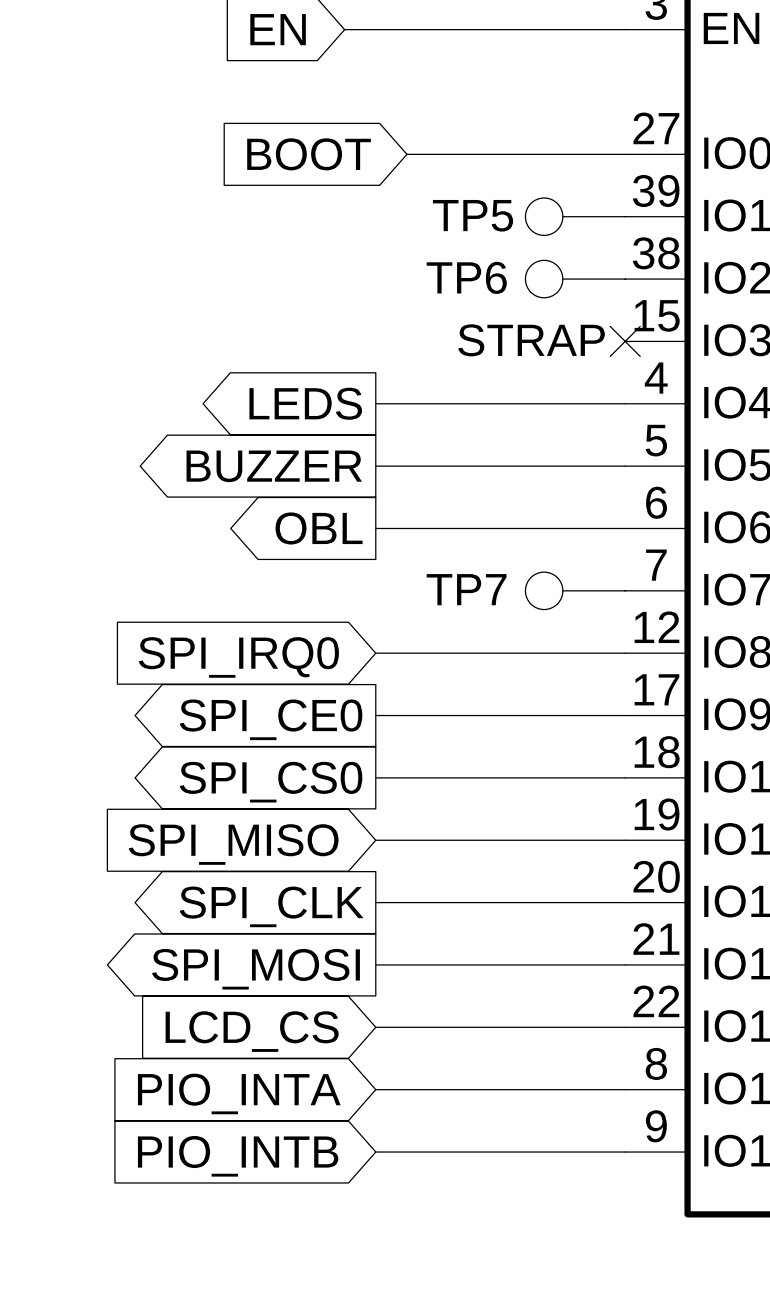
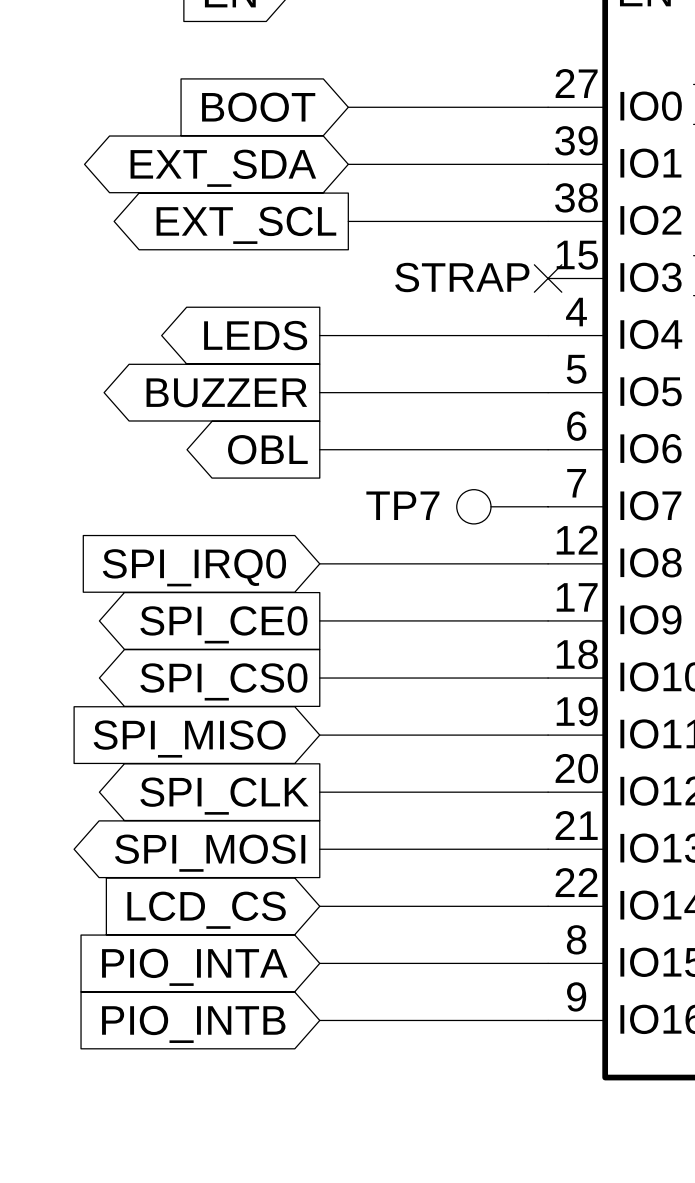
wire: none -> (348, 164) (548, 164)
TP5: (575, 216) -> none
global label: none -> EXT_SDA (223, 168)
wire: none -> (348, 221) (548, 221)
TP6: (575, 279) -> none
global label: none -> EXT_SCL (246, 225)

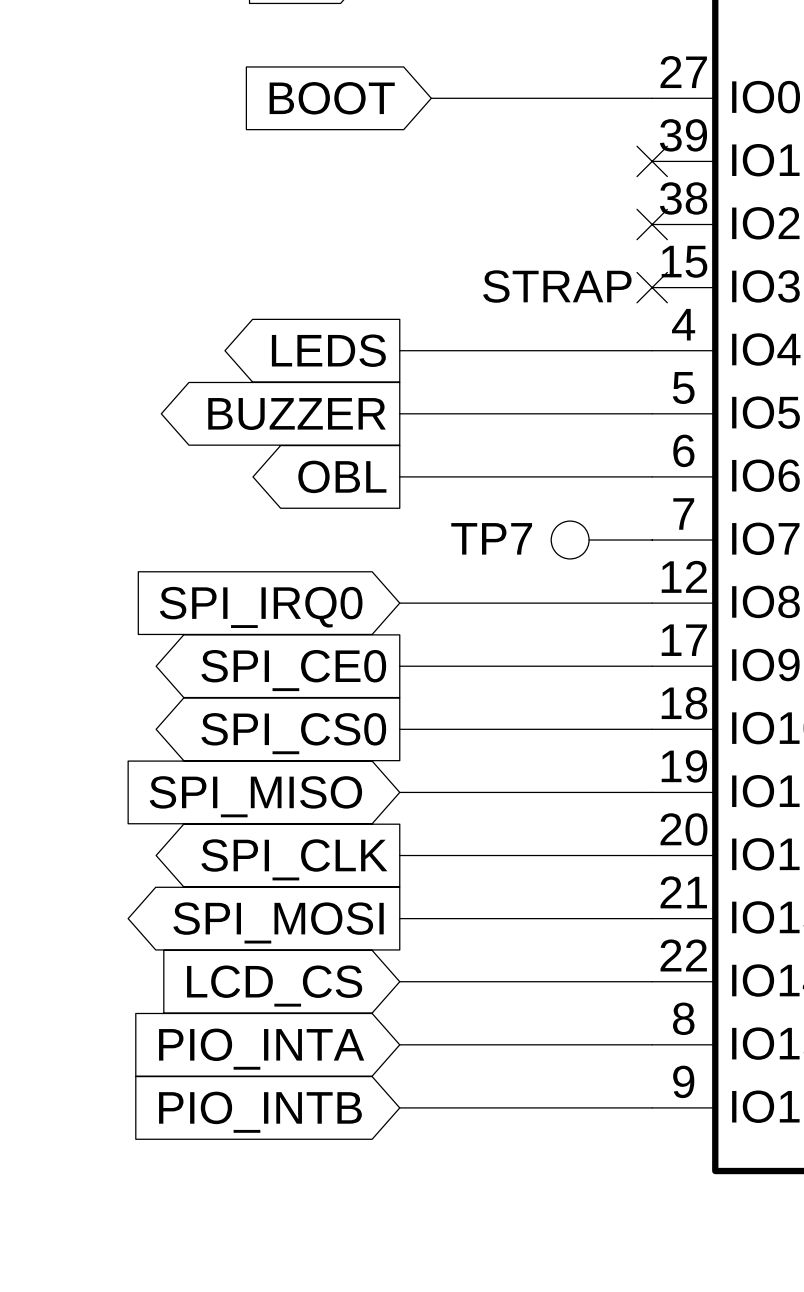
wire: (348, 164) (548, 164) -> none
no-connect mark: none -> (652, 161)
global label: EXT_SDA (223, 168) -> none
wire: (348, 221) (548, 221) -> none
no-connect mark: none -> (652, 224)
global label: EXT_SCL (246, 225) -> none

